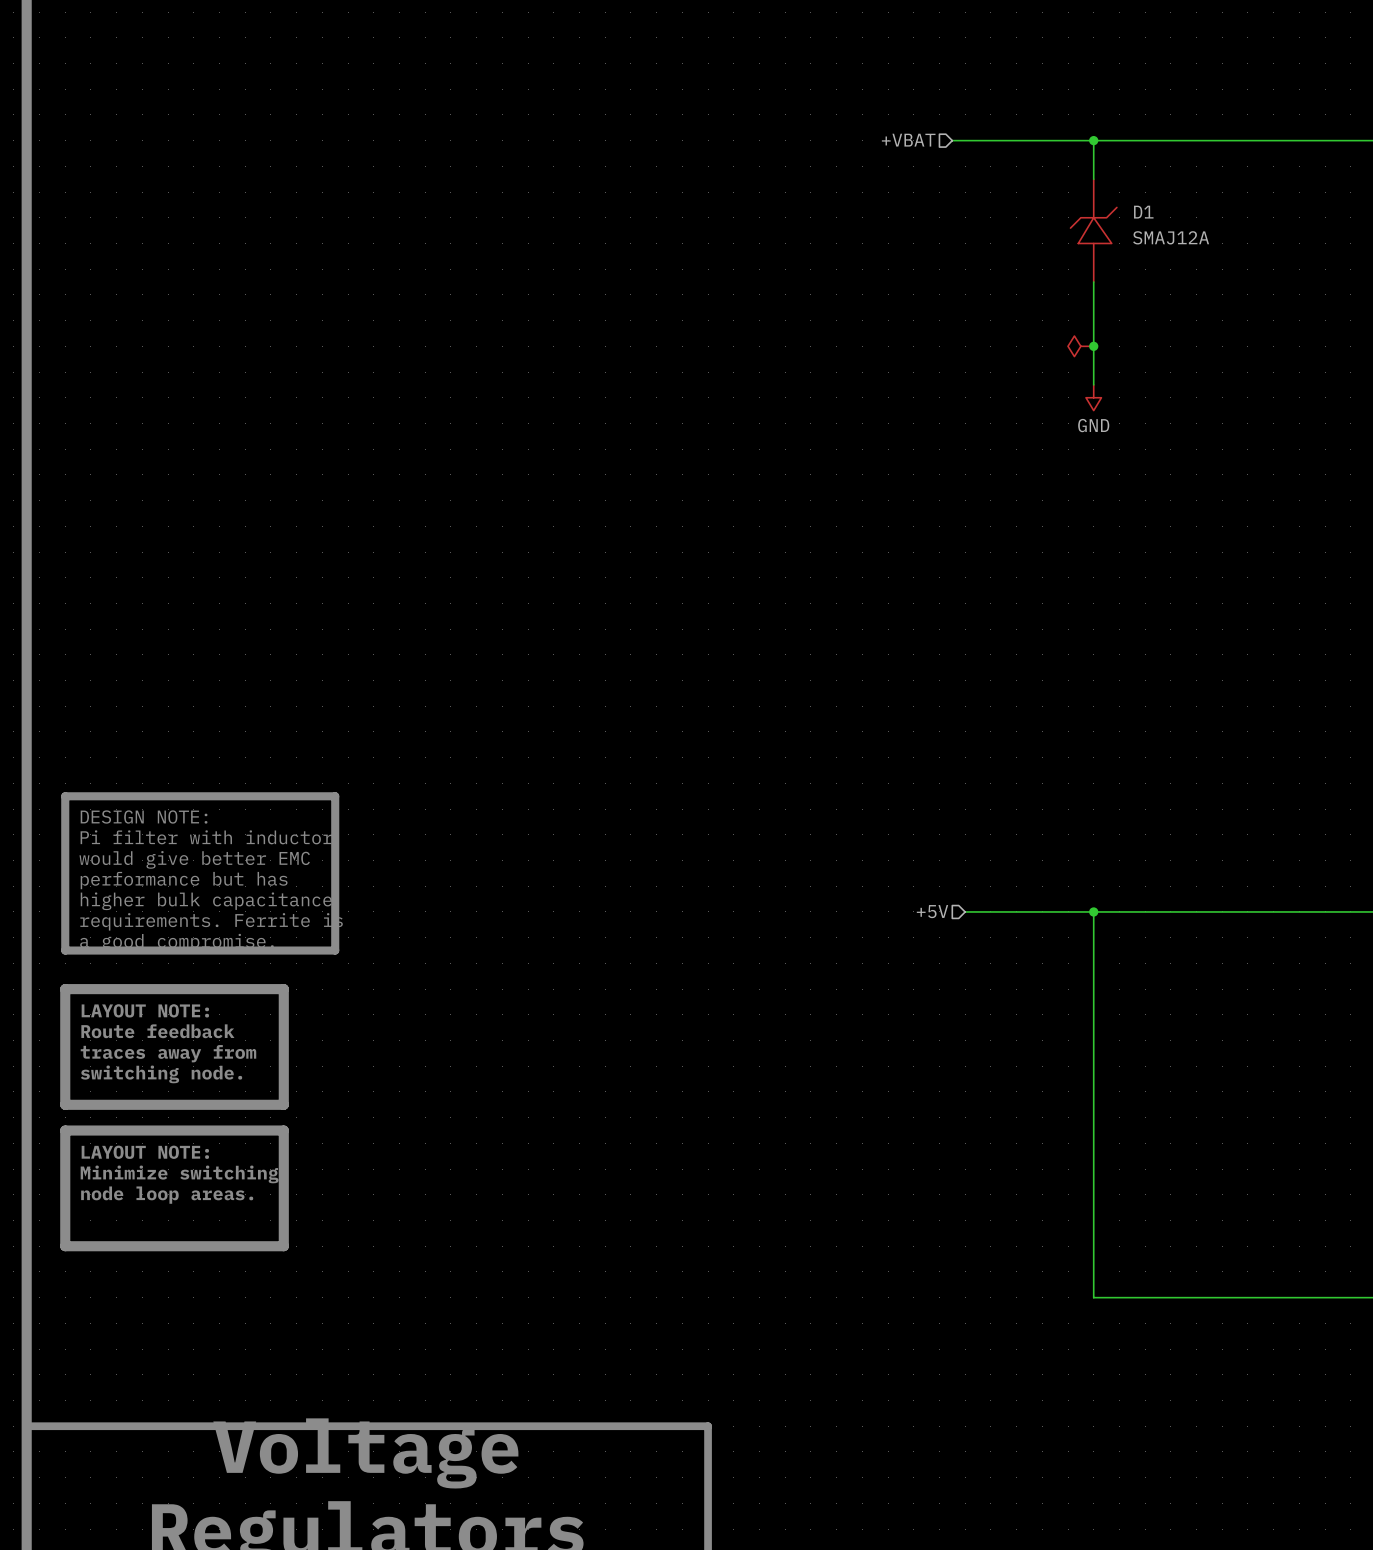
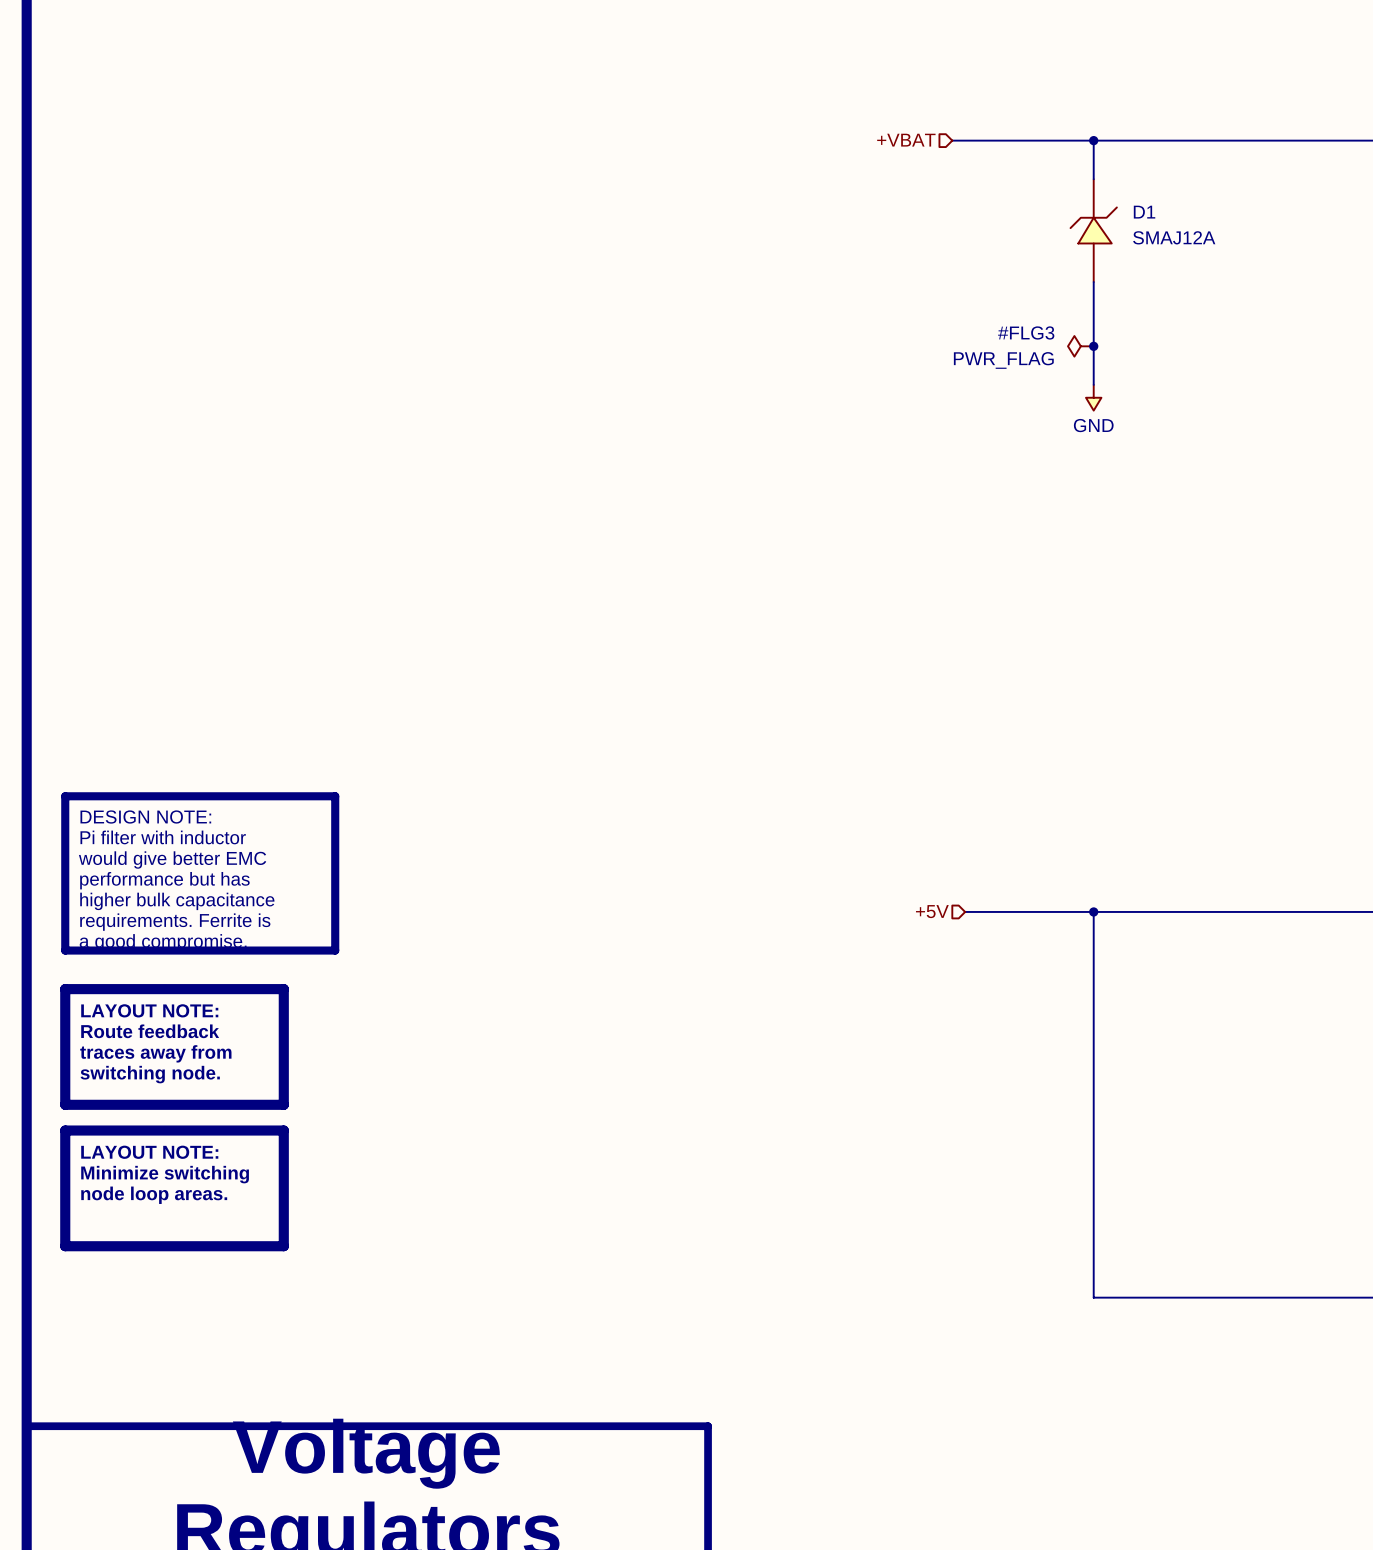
#FLG3 name: none -> #FLG3 (1026, 332)
#FLG3 text: none -> PWR_FLAG (1003, 360)

